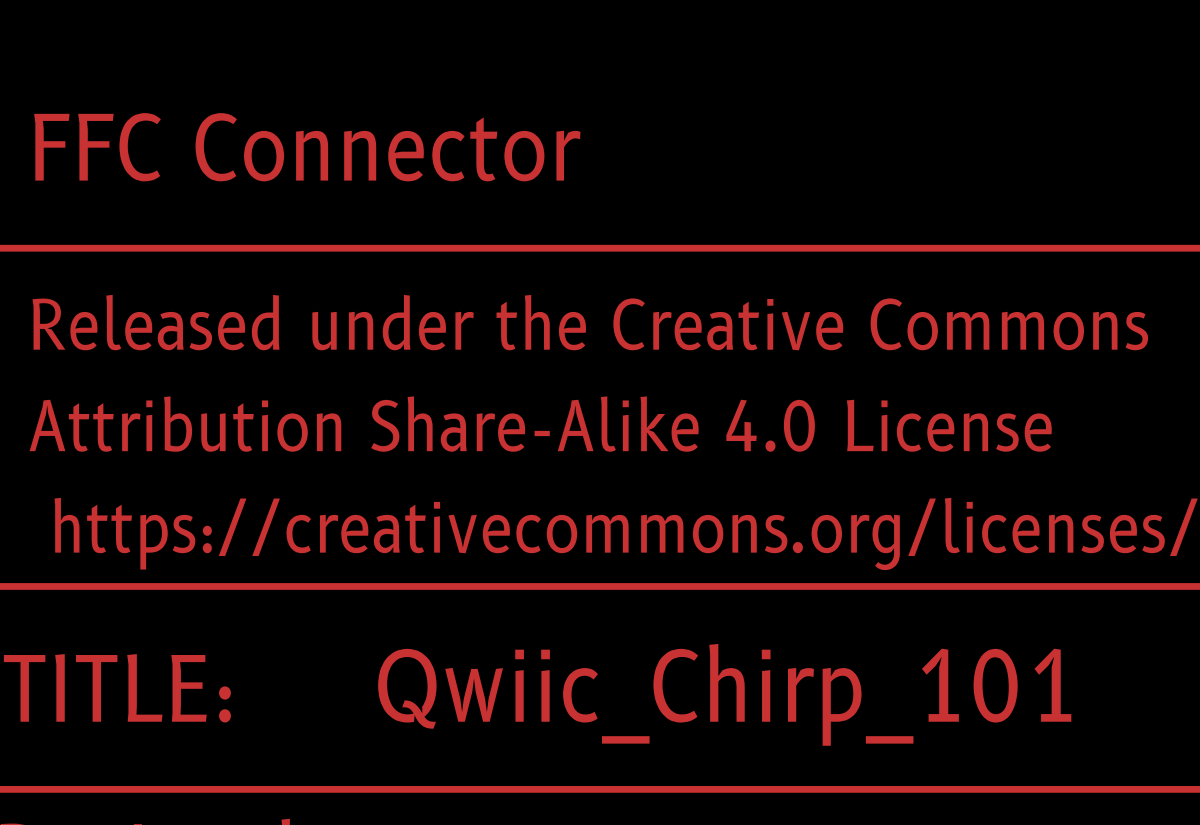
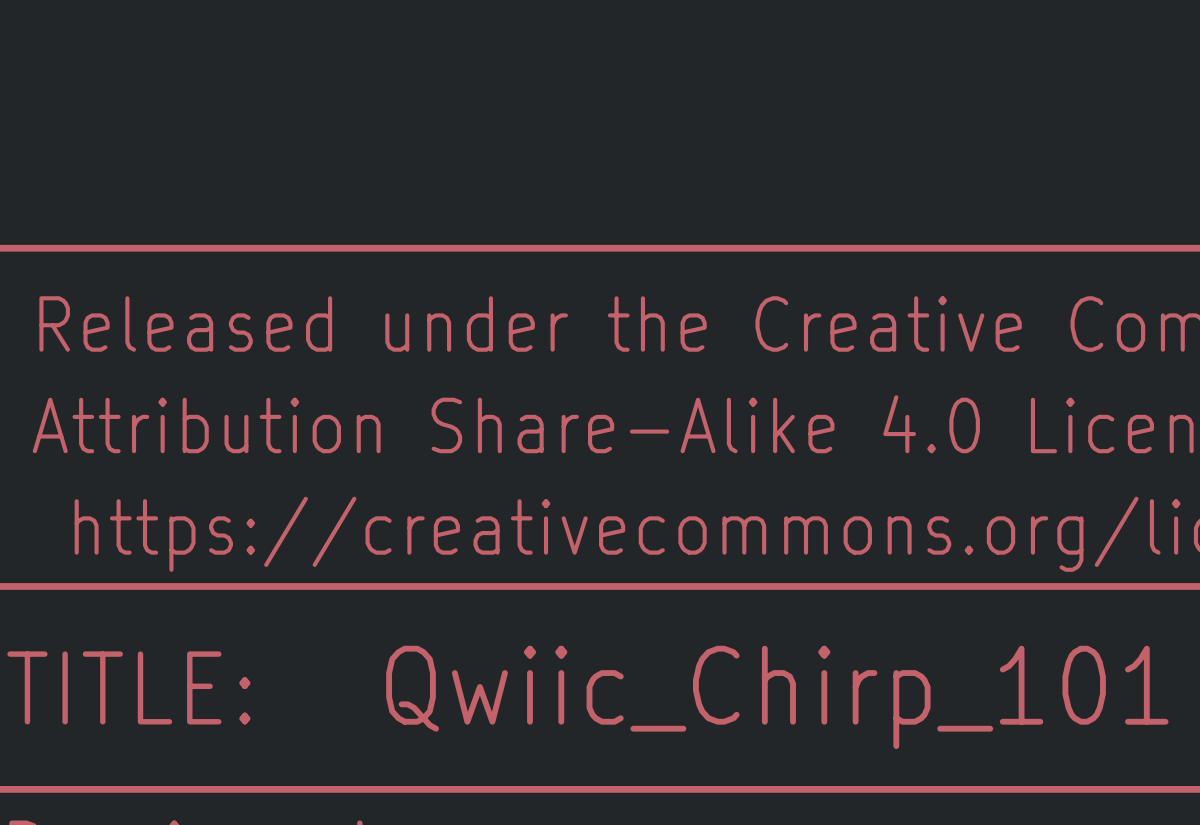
text: FFC Connector (307, 147) -> none

